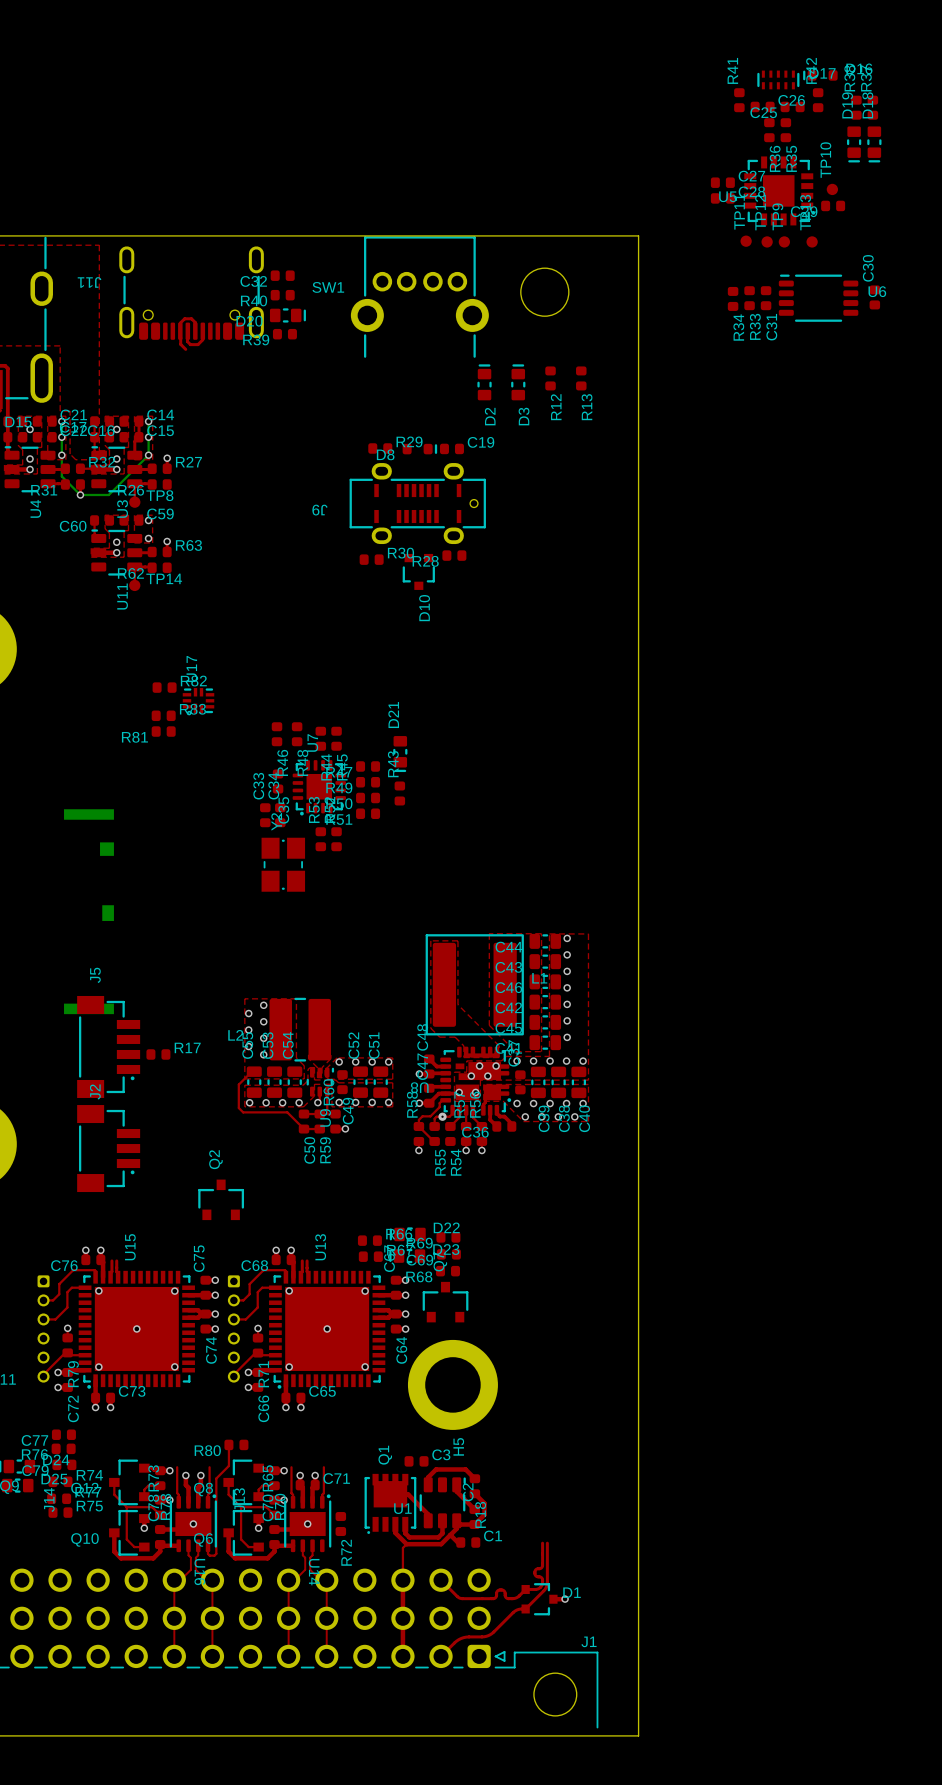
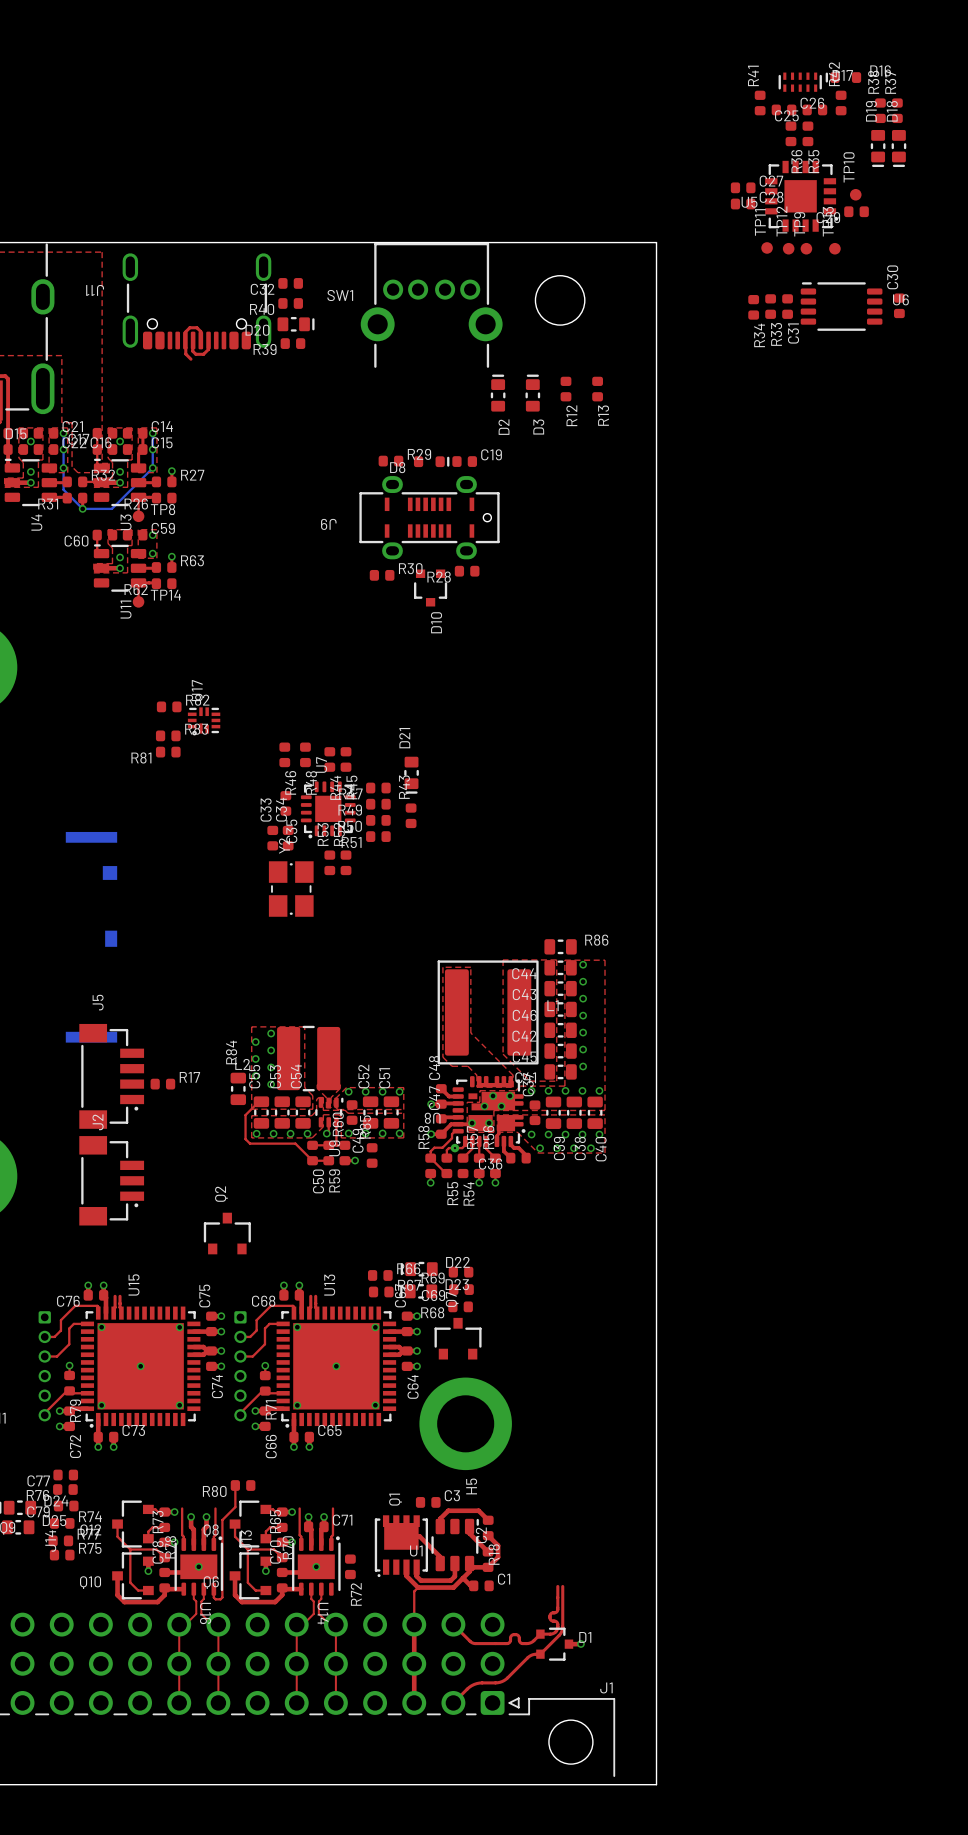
R86: none -> (560, 946)
R84: none -> (238, 1088)
R85: none -> (372, 1155)

